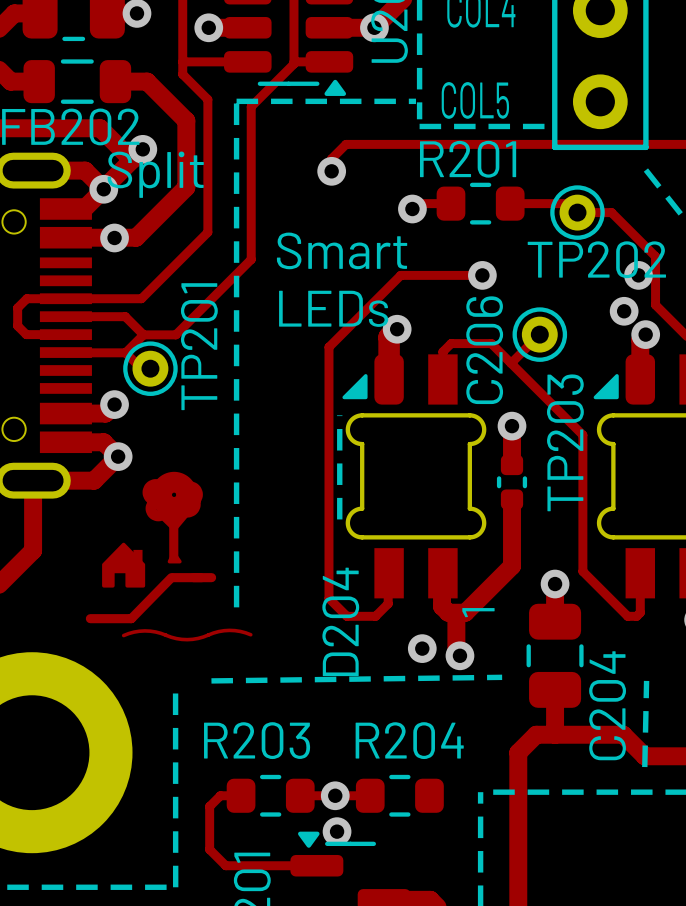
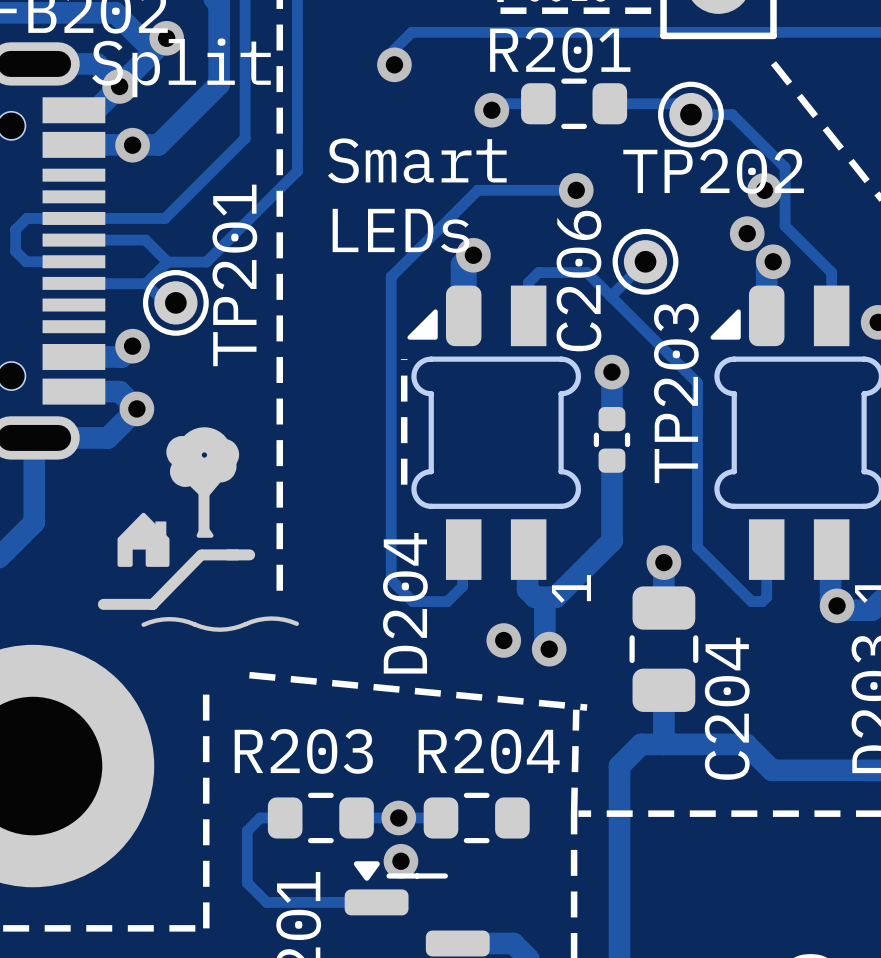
line: none -> (249, 675) (587, 707)
line: (502, 677) (211, 680) -> none
line: (646, 680) (644, 767) -> (576, 709) (574, 813)

